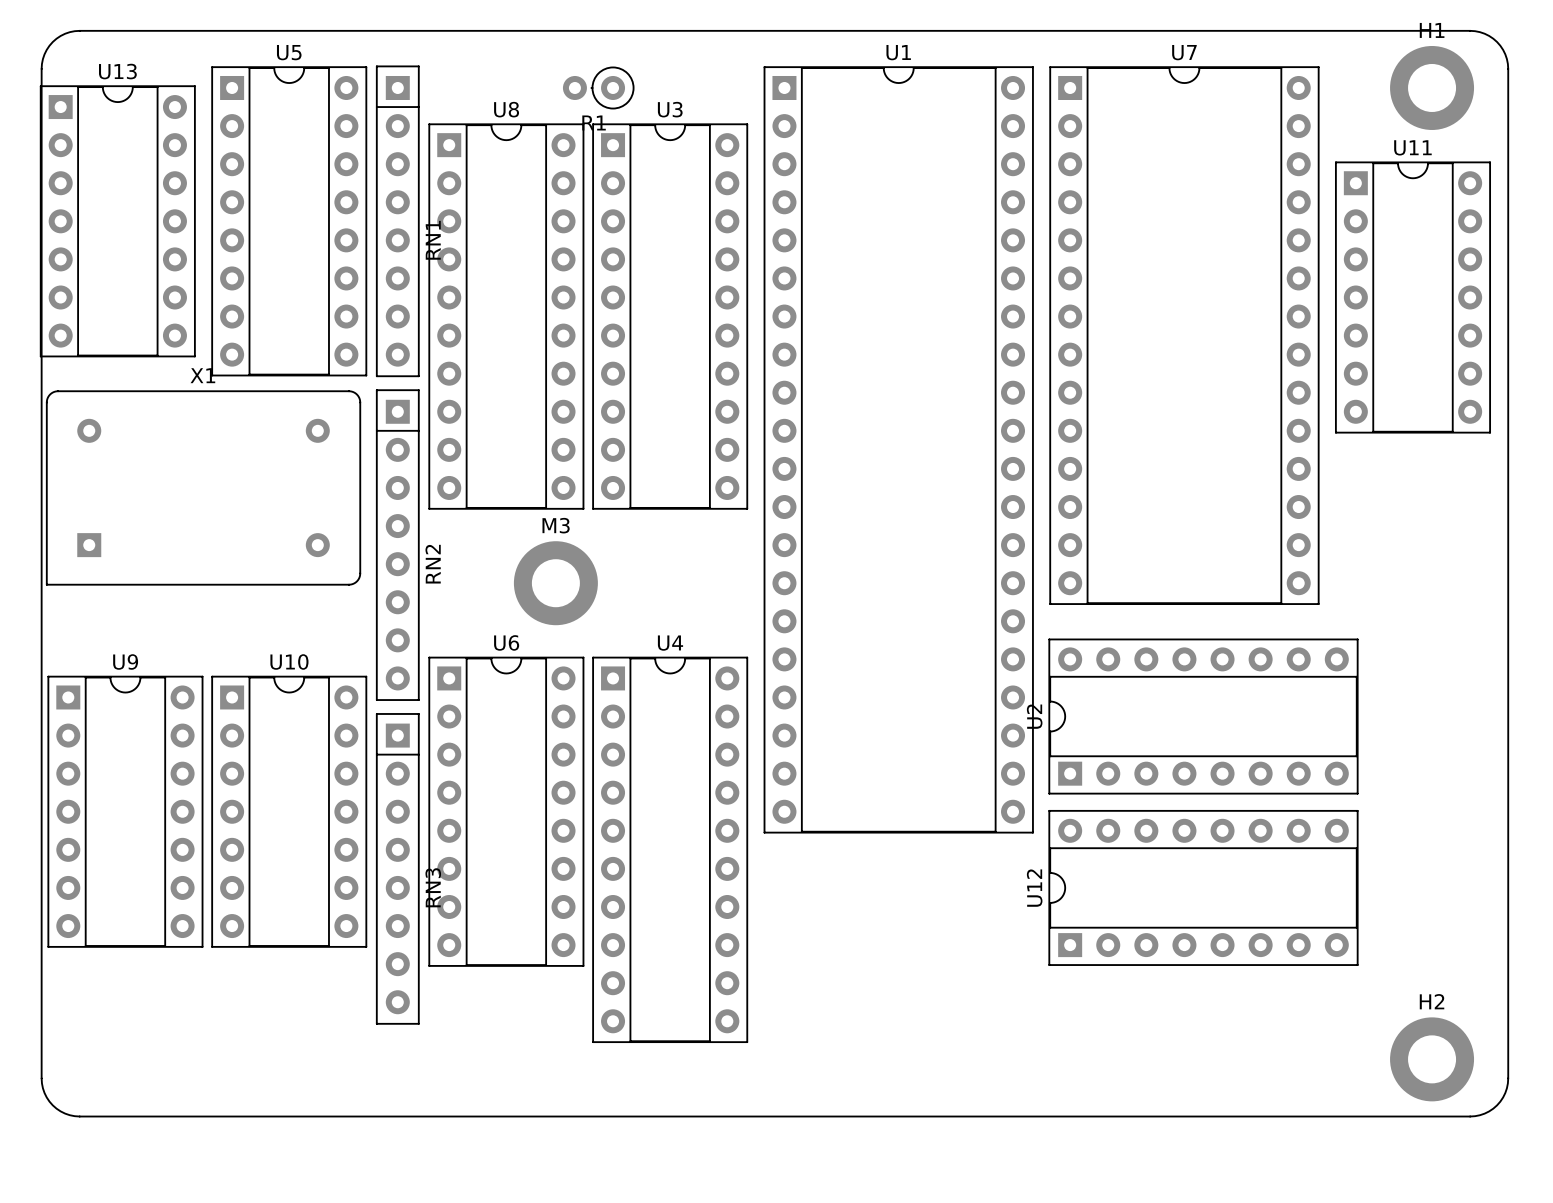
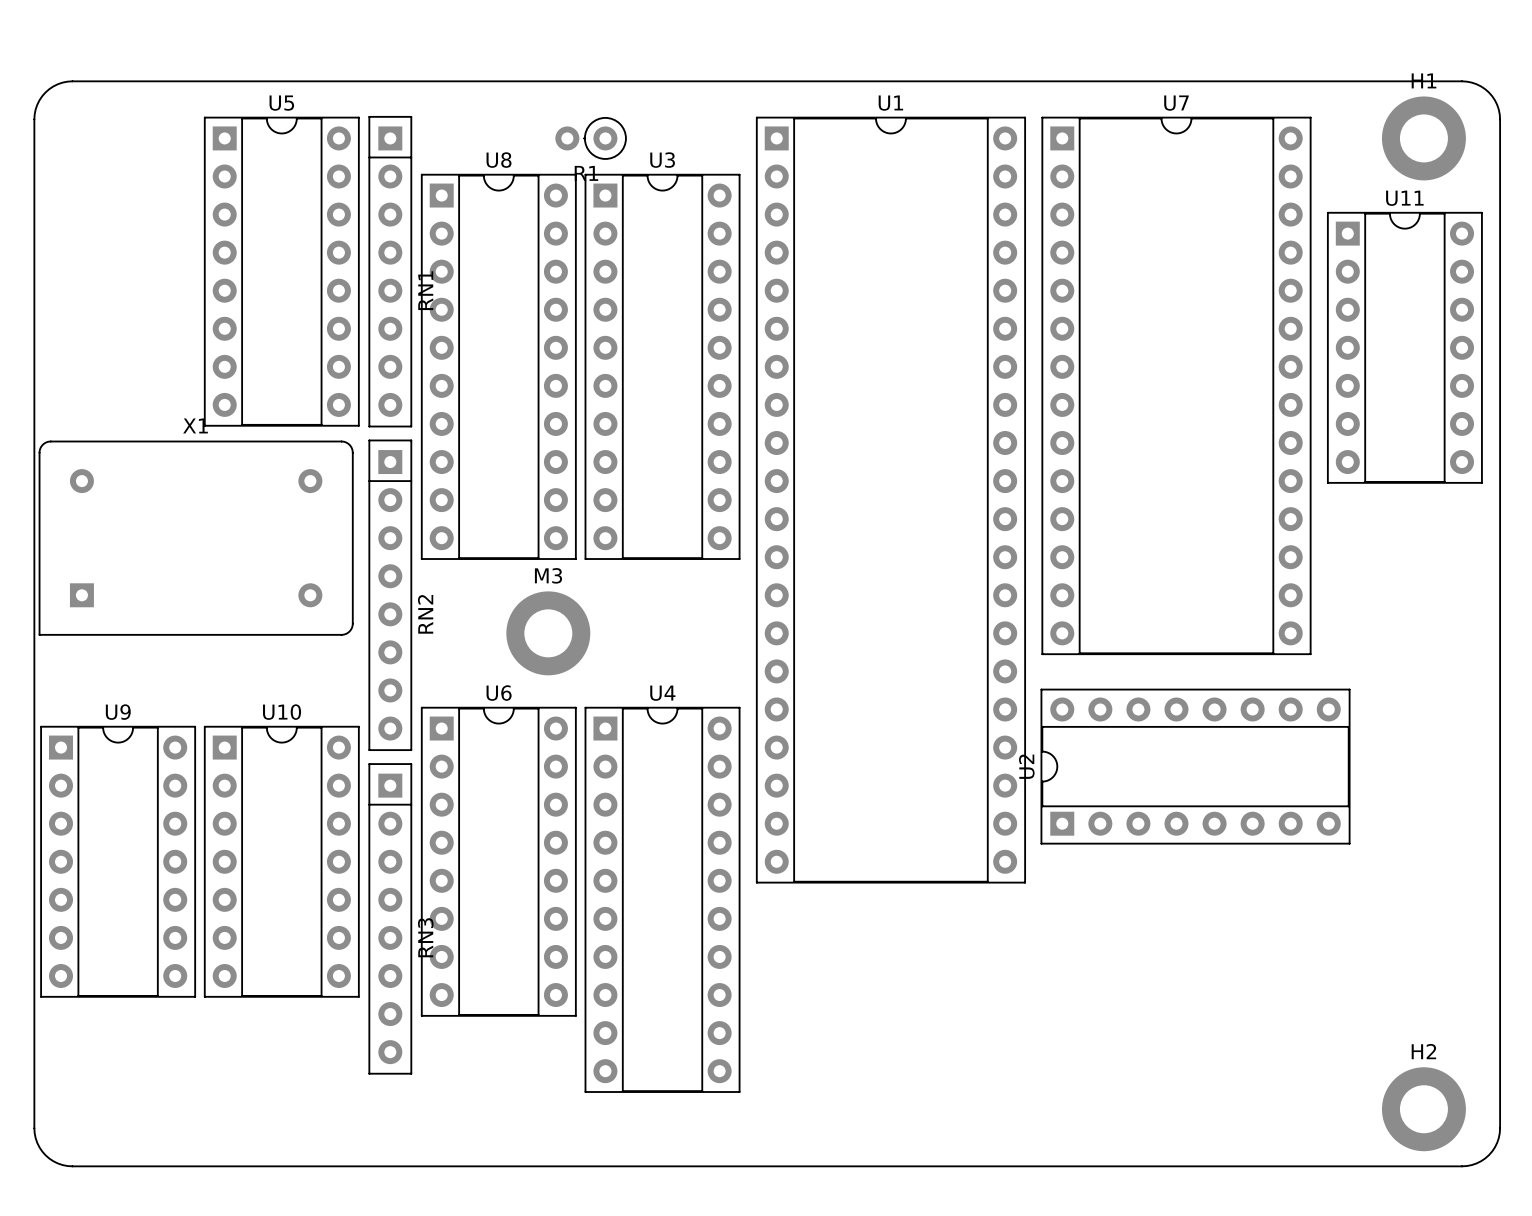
U13: (117, 221) -> none
U12: (1203, 887) -> none

